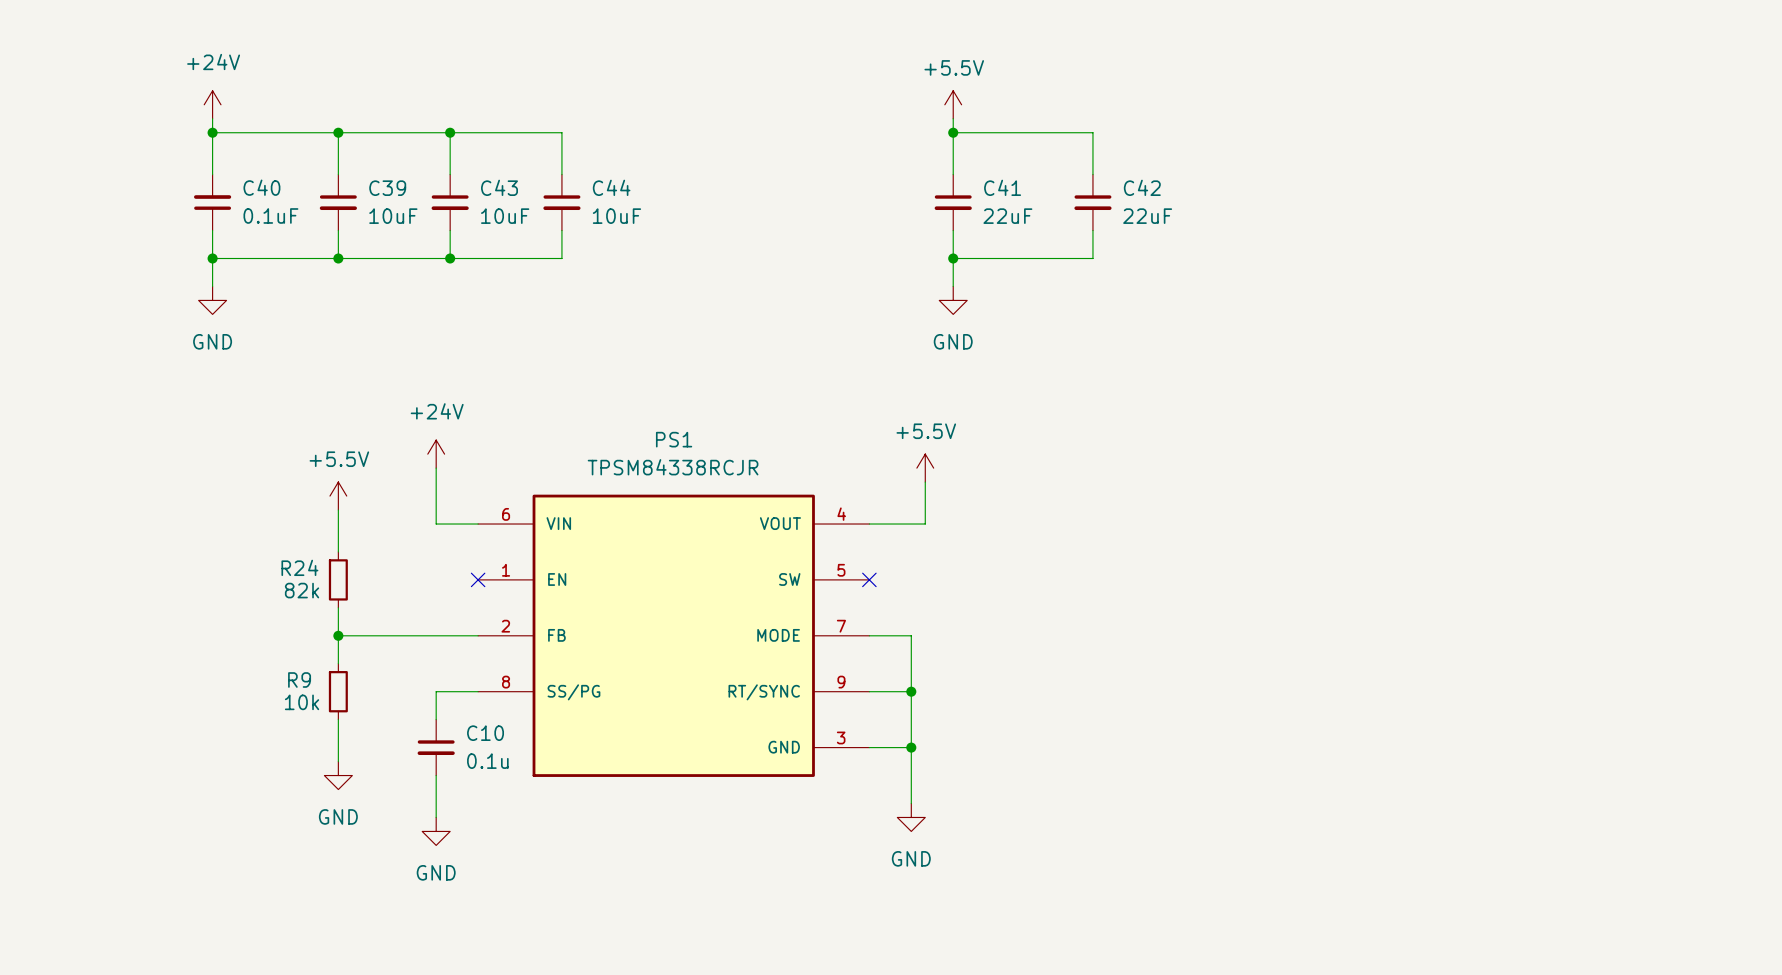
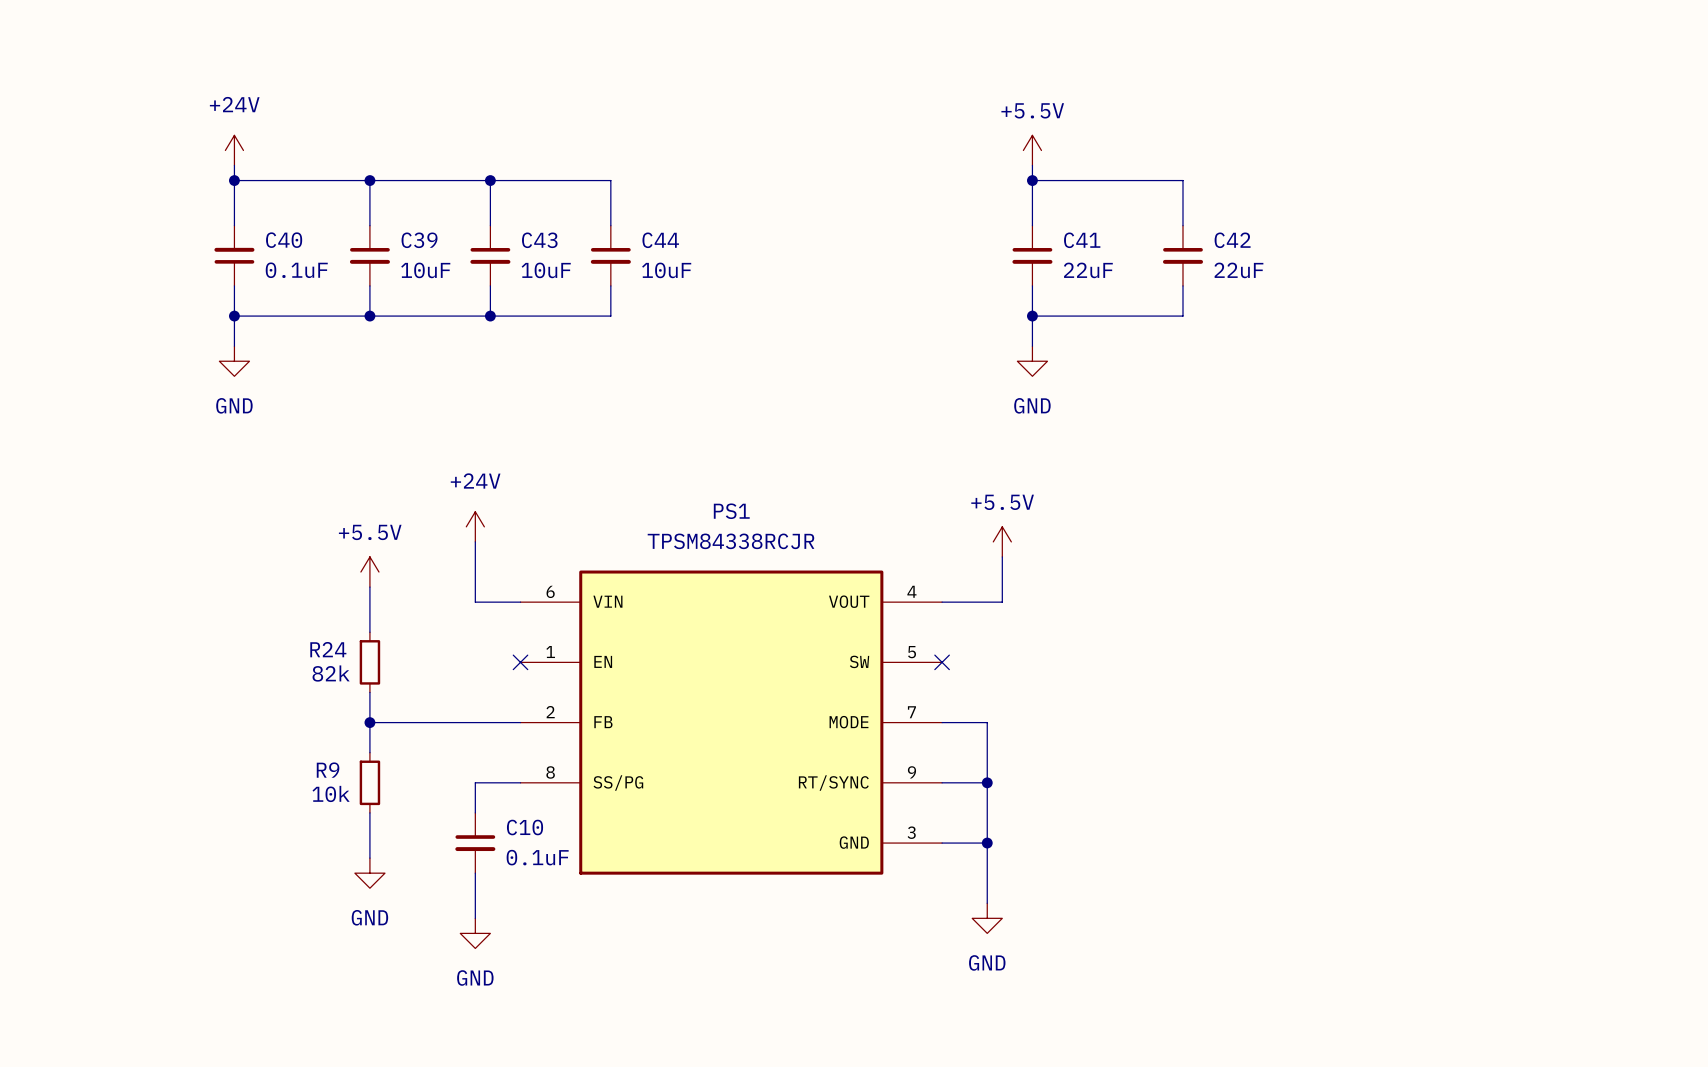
C10 value: 0.1u (487, 761) -> 0.1uF (537, 857)

